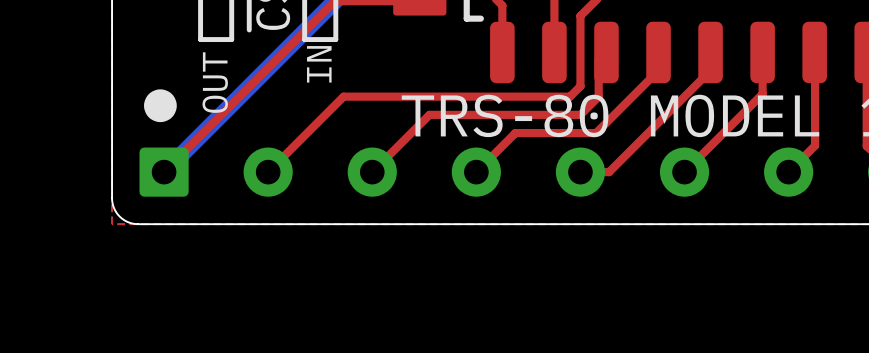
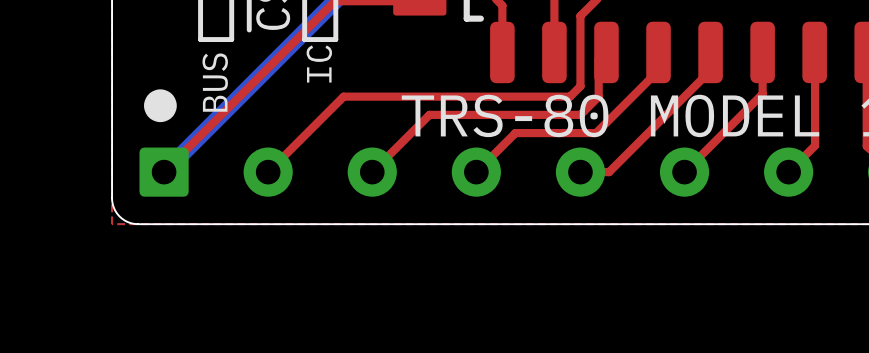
text: IN (319, 64) -> IC (319, 64)
text: OUT (215, 82) -> BUS (215, 82)

